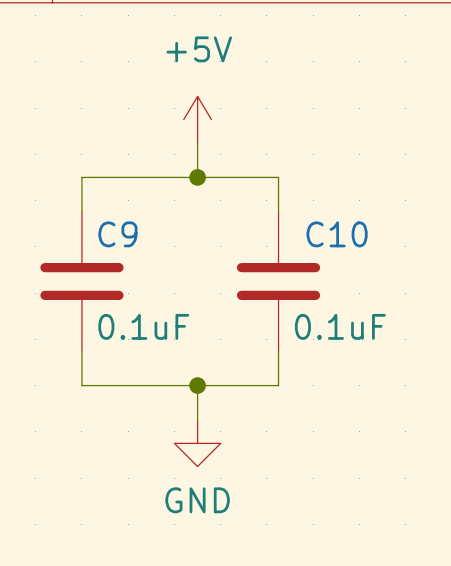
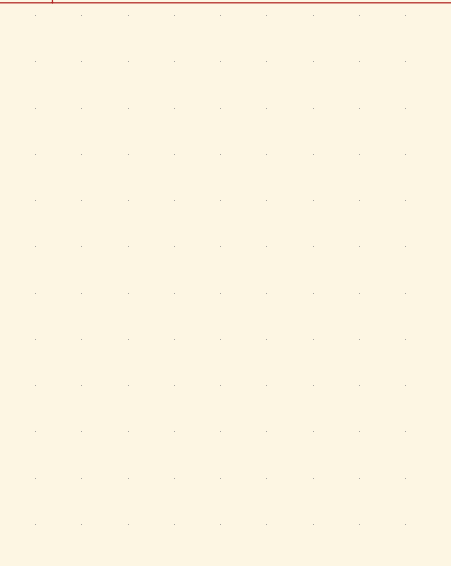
power symbol: +5V (197, 119) -> none
wire: (197, 142) (197, 177) -> none
junction: (197, 177) -> none
wire: (81, 212) (81, 177) (278, 177) (278, 212) -> none
C9: 0.1uF (81, 281) -> none
C10: 0.1uF (278, 281) -> none
wire: (81, 350) (81, 385) (278, 385) (278, 350) -> none
wire: (197, 385) (197, 420) -> none
junction: (197, 385) -> none
power symbol: GND (197, 443) -> none

